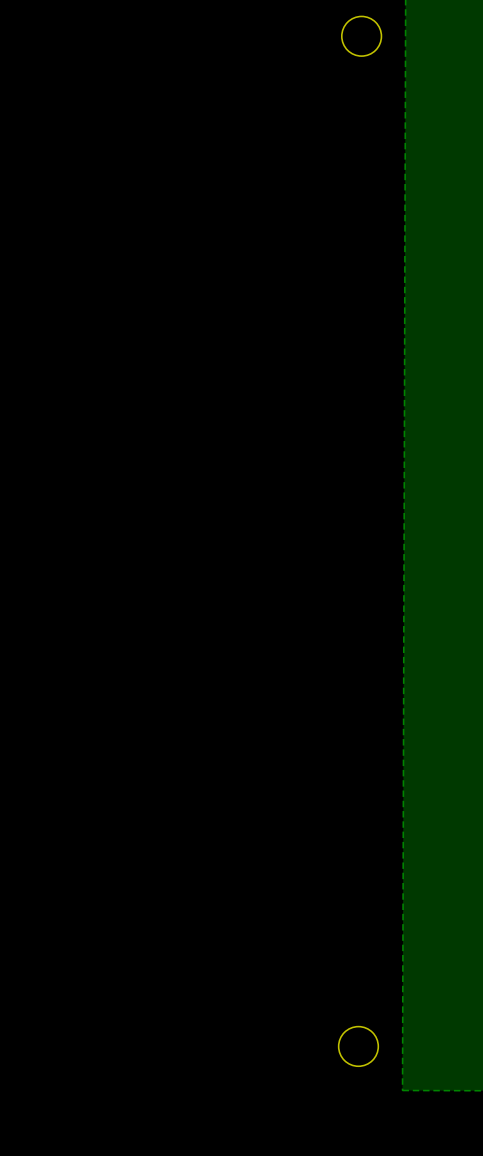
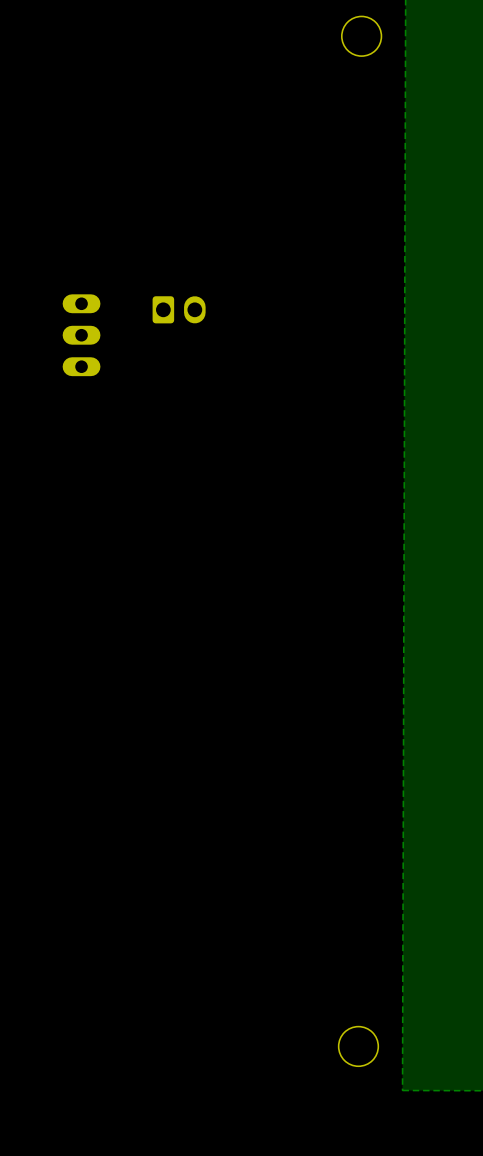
part: none -> (179, 309)
part: none -> (81, 335)

